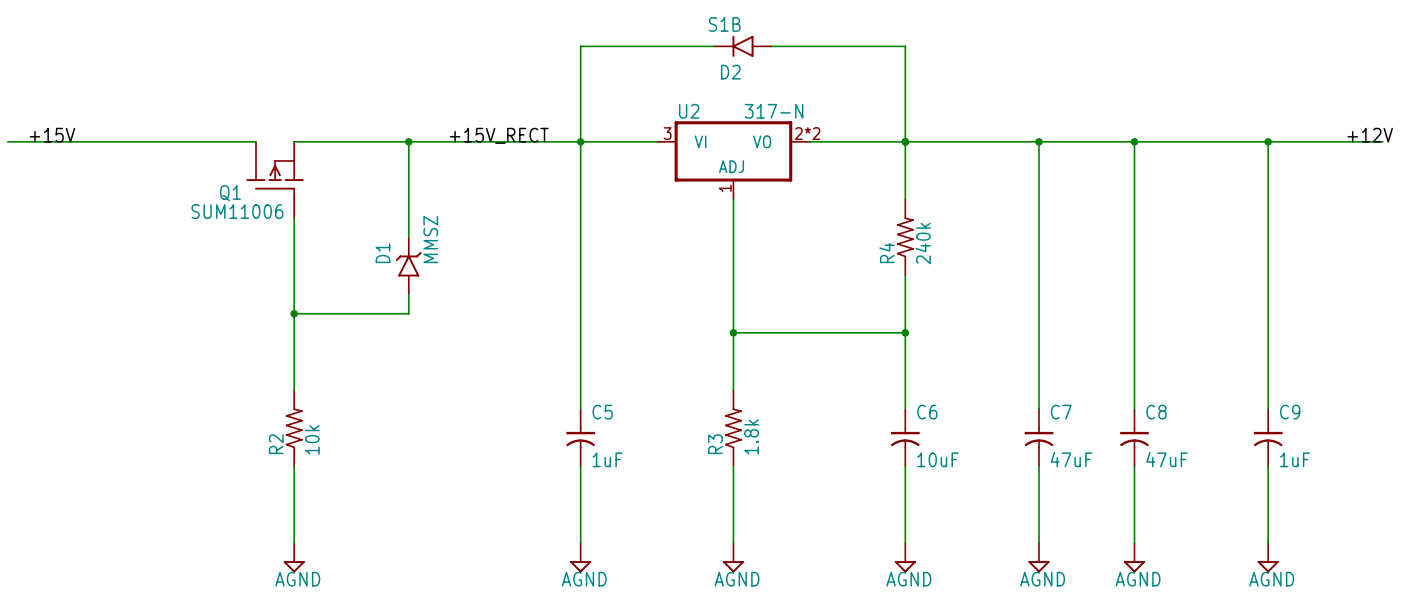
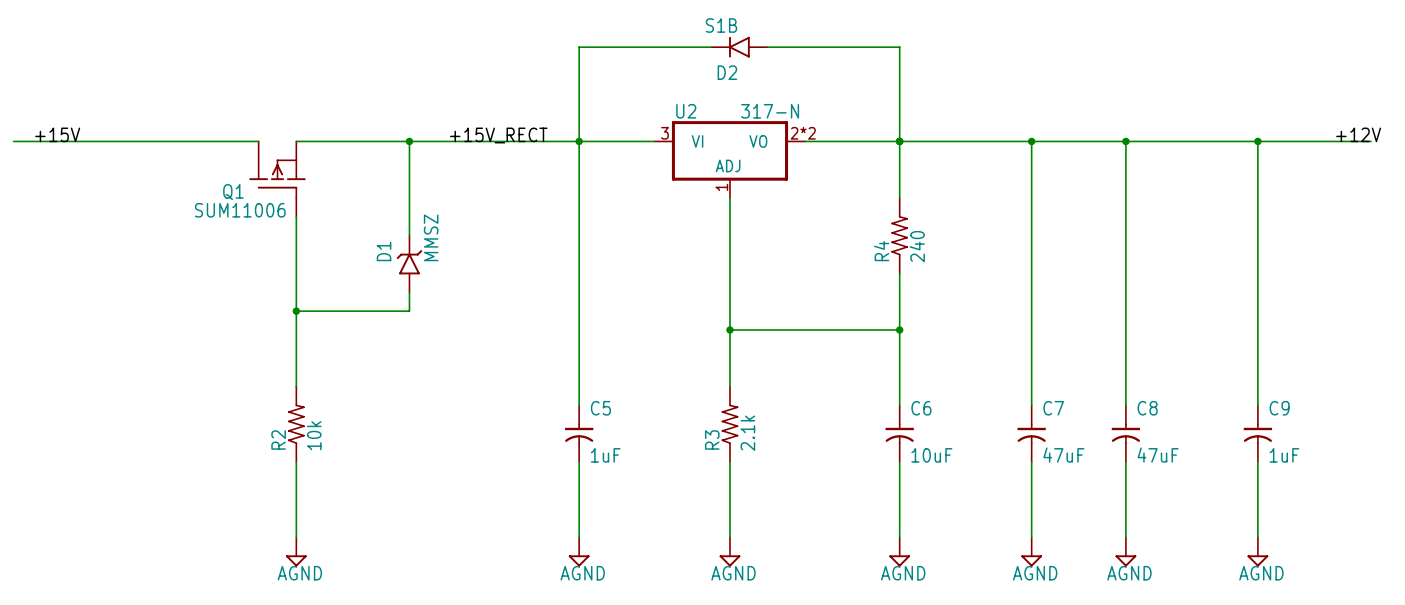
R4 value: 240k (923, 243) -> 240 (917, 246)
R3 value: 1.8k (751, 437) -> 2.1k (747, 433)

